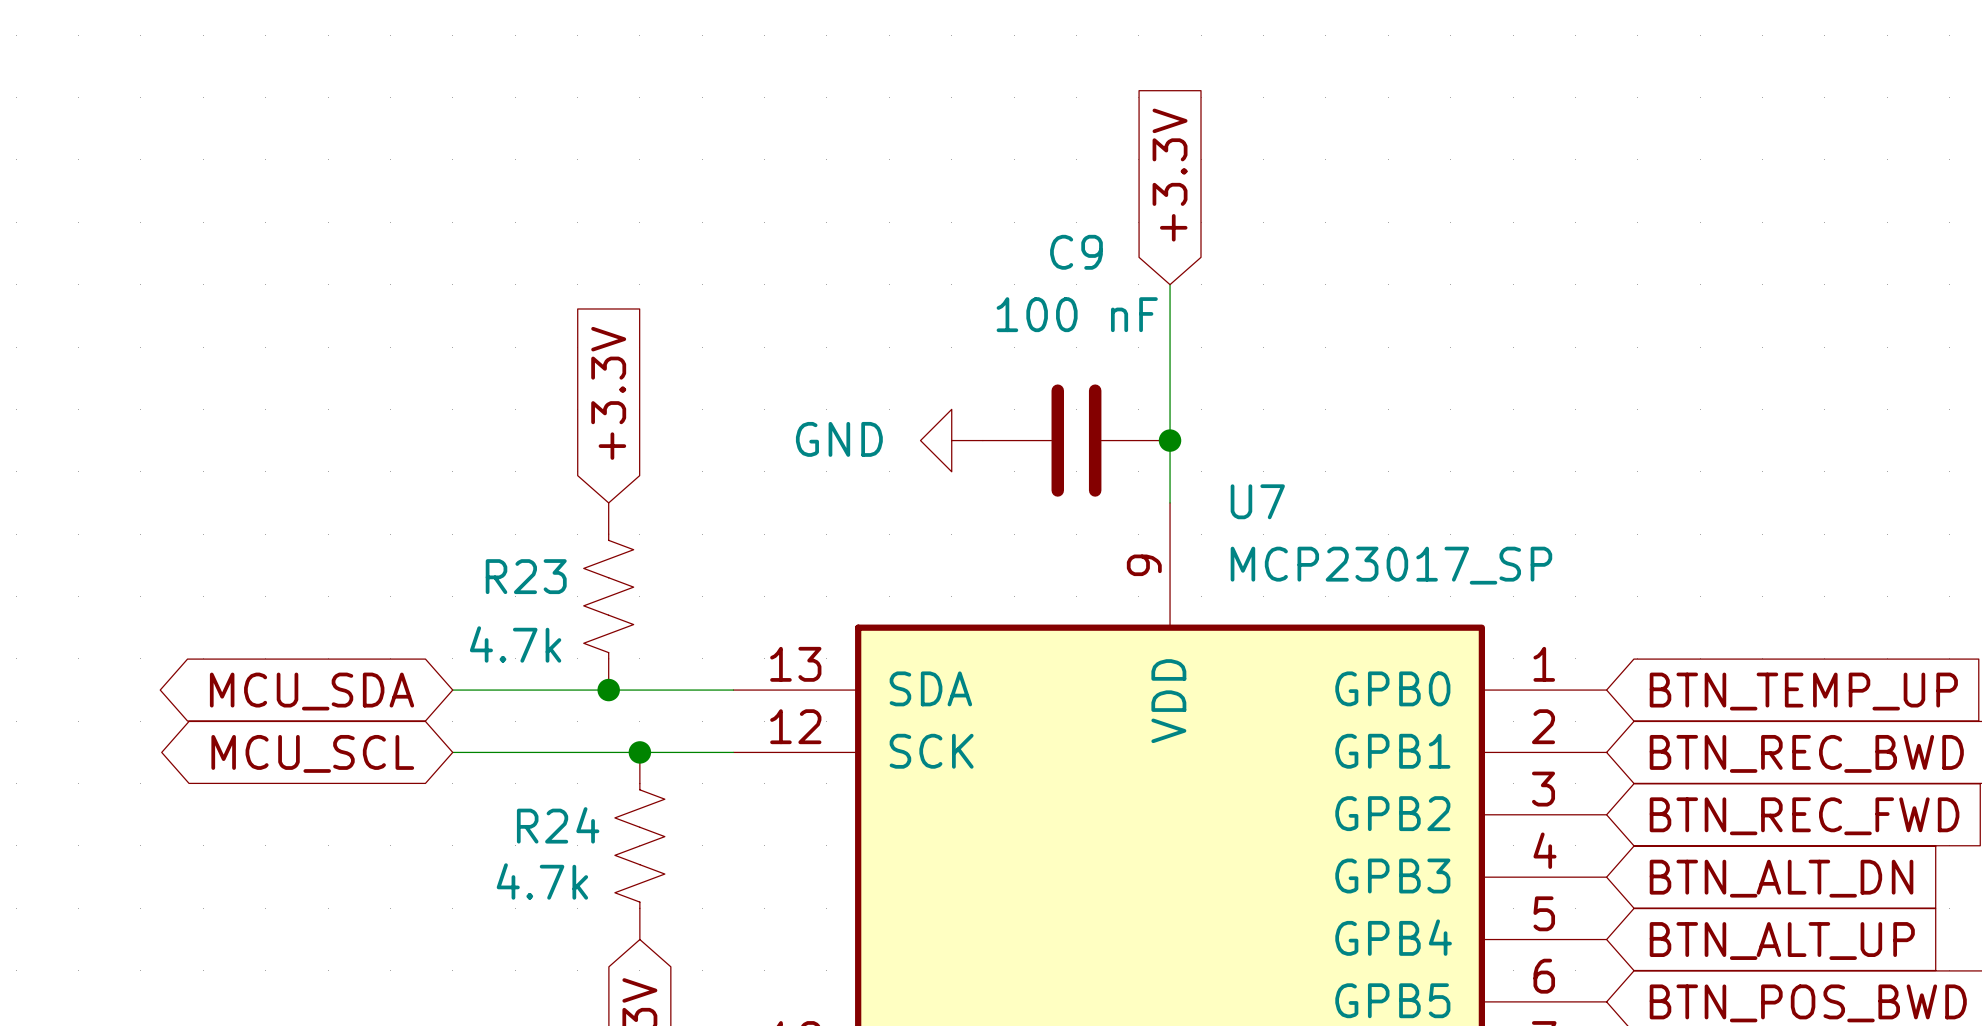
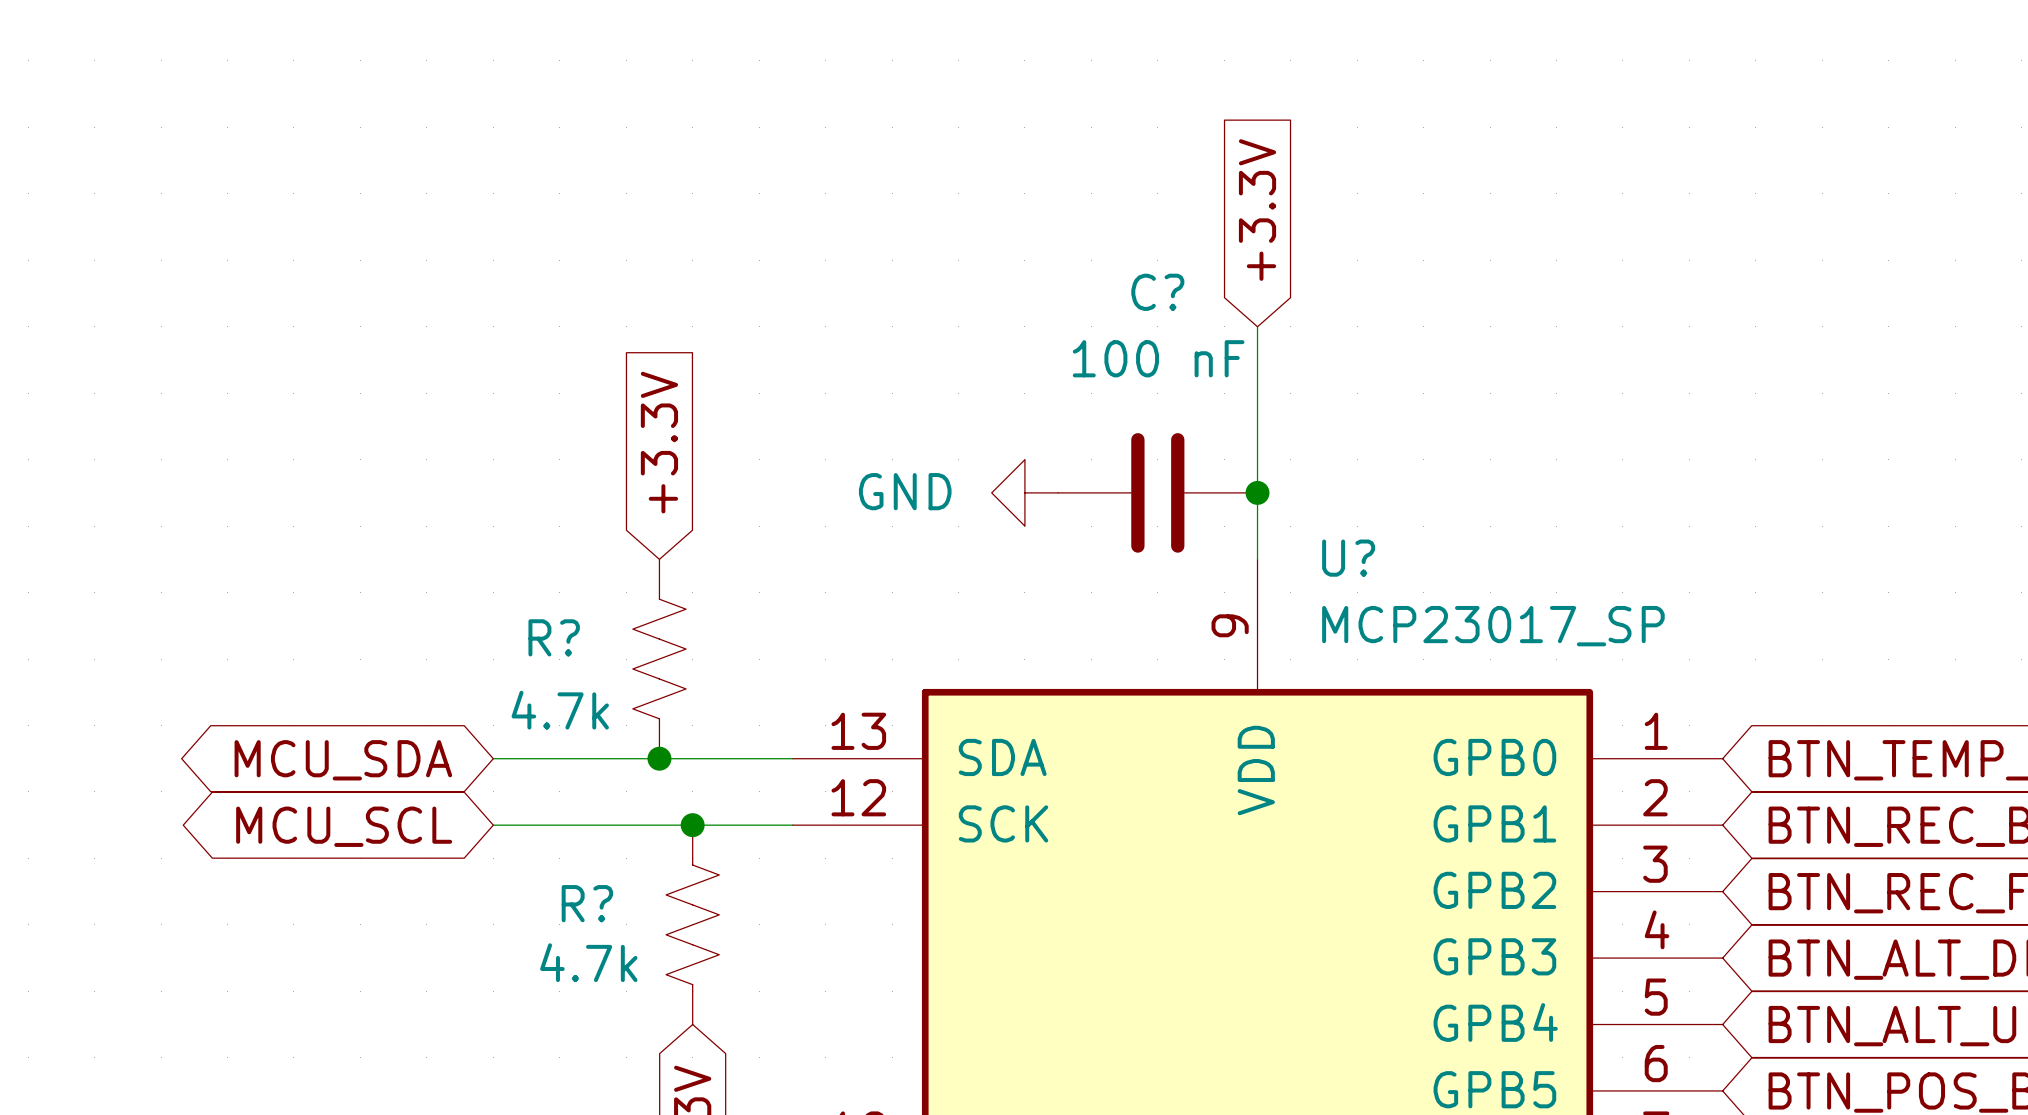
C9 name: C9 (1076, 252) -> C? (1157, 292)
U7 name: U7 (1257, 501) -> U? (1348, 558)
R23 name: R23 (526, 576) -> R? (554, 637)
R24 name: R24 (558, 825) -> R? (587, 903)

